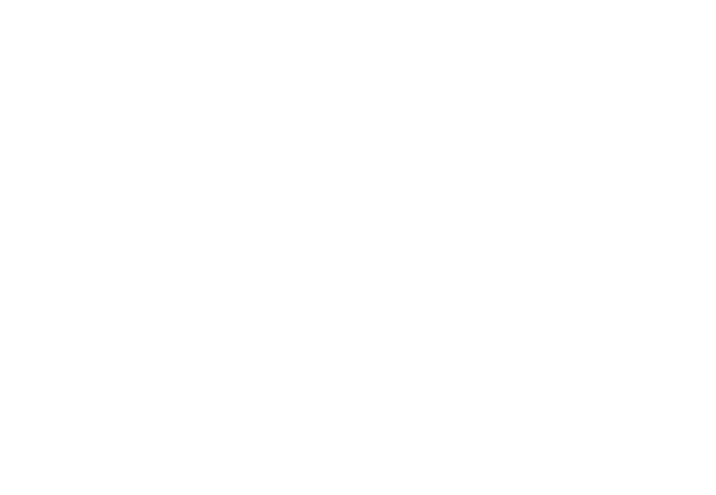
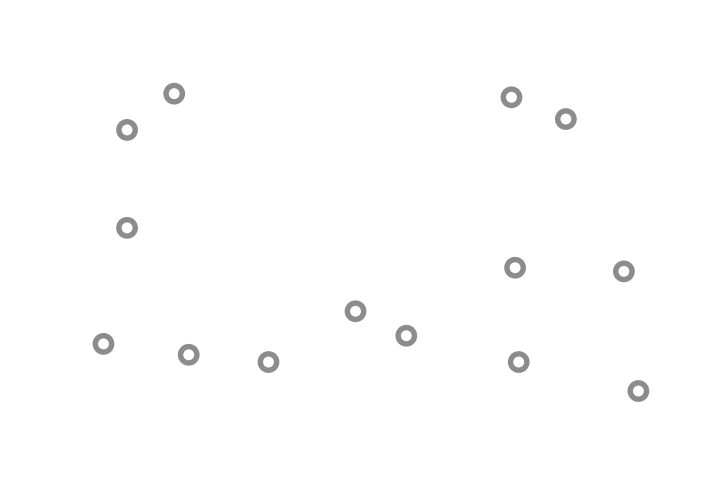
via: none -> (174, 93)
via: none -> (511, 97)
via: none -> (565, 119)
via: none -> (127, 129)
via: none -> (127, 227)
via: none -> (515, 267)
via: none -> (623, 271)
via: none -> (355, 311)
via: none -> (406, 335)
via: none -> (103, 343)
via: none -> (188, 354)
via: none -> (268, 362)
via: none -> (518, 362)
via: none -> (638, 391)

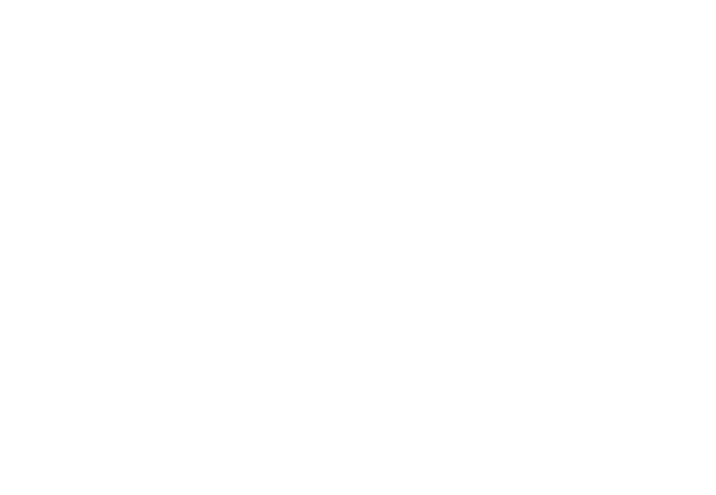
via: (174, 93) -> none
via: (511, 97) -> none
via: (565, 119) -> none
via: (127, 129) -> none
via: (127, 227) -> none
via: (515, 267) -> none
via: (623, 271) -> none
via: (355, 311) -> none
via: (406, 335) -> none
via: (103, 343) -> none
via: (188, 354) -> none
via: (268, 362) -> none
via: (518, 362) -> none
via: (638, 391) -> none

